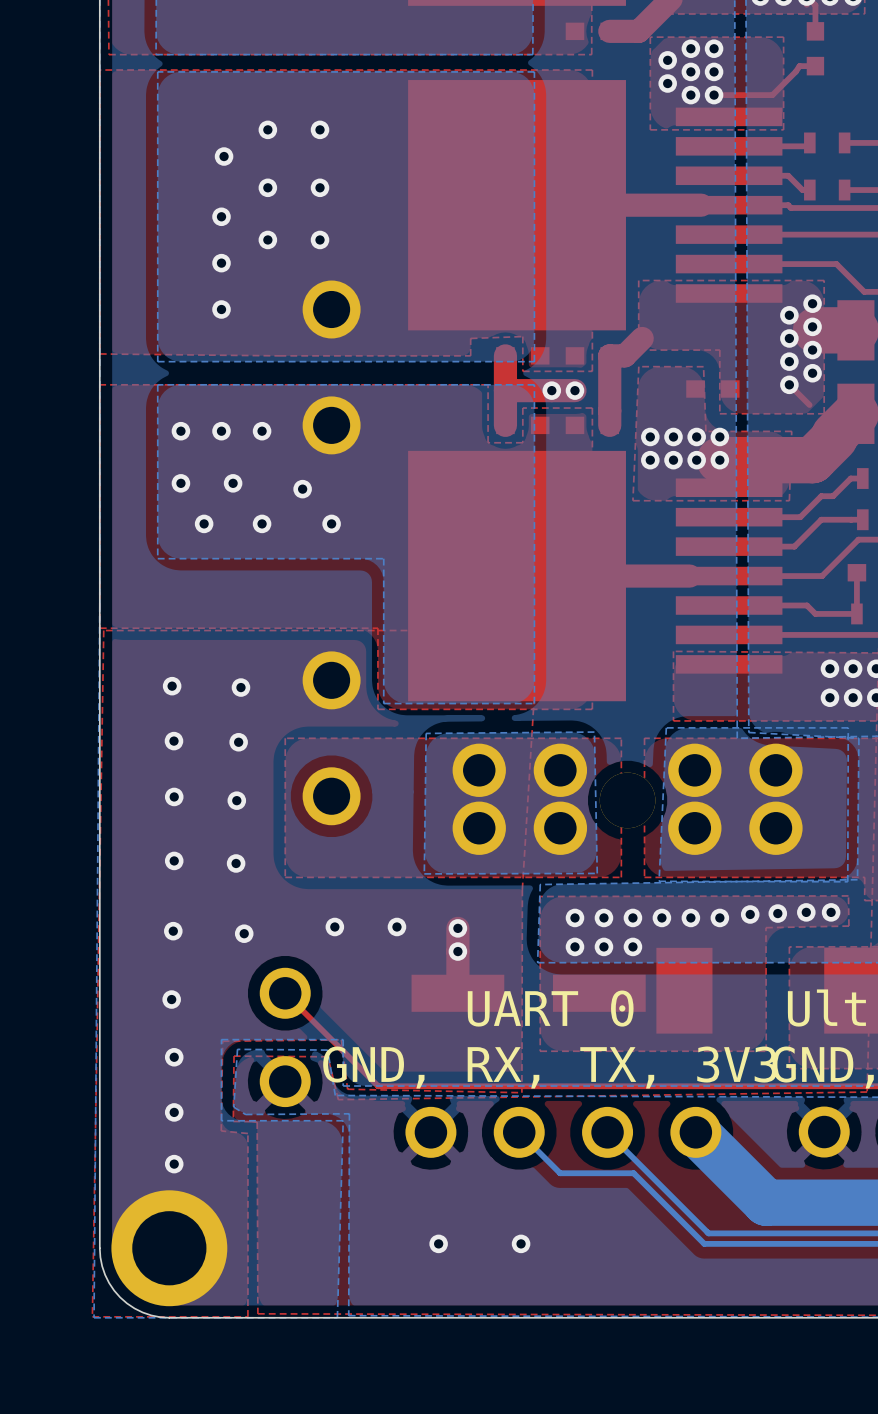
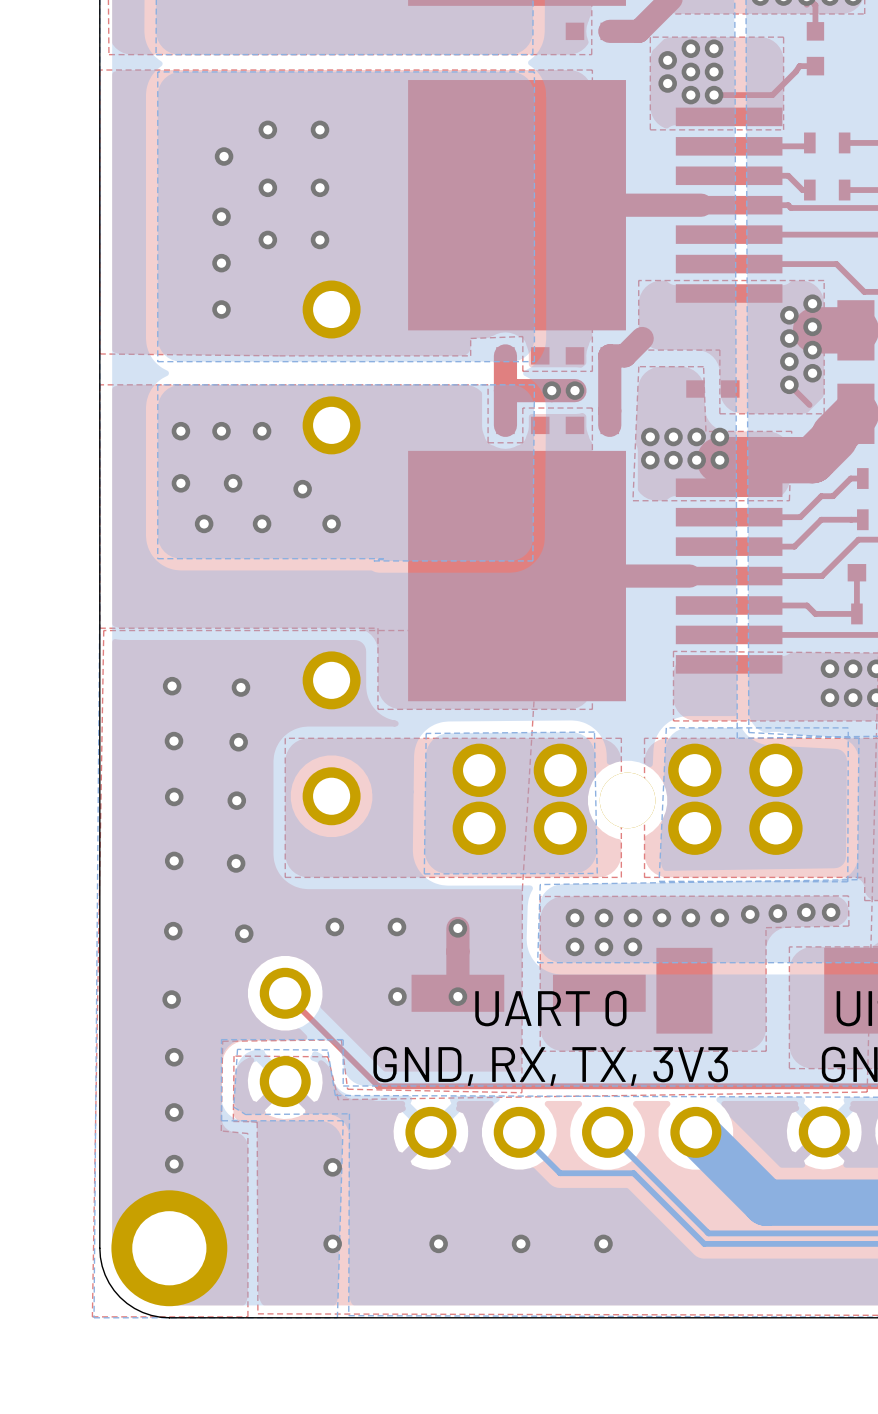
bottom zone outline: (534, 384) (534, 703) (383, 703) (383, 558) -> (534, 384) (532, 560) (373, 560) (383, 558)
via: (457, 951) -> none
via: none -> (397, 996)
via: none -> (457, 996)
via: none -> (332, 1167)
via: none -> (332, 1243)
via: none -> (603, 1243)

